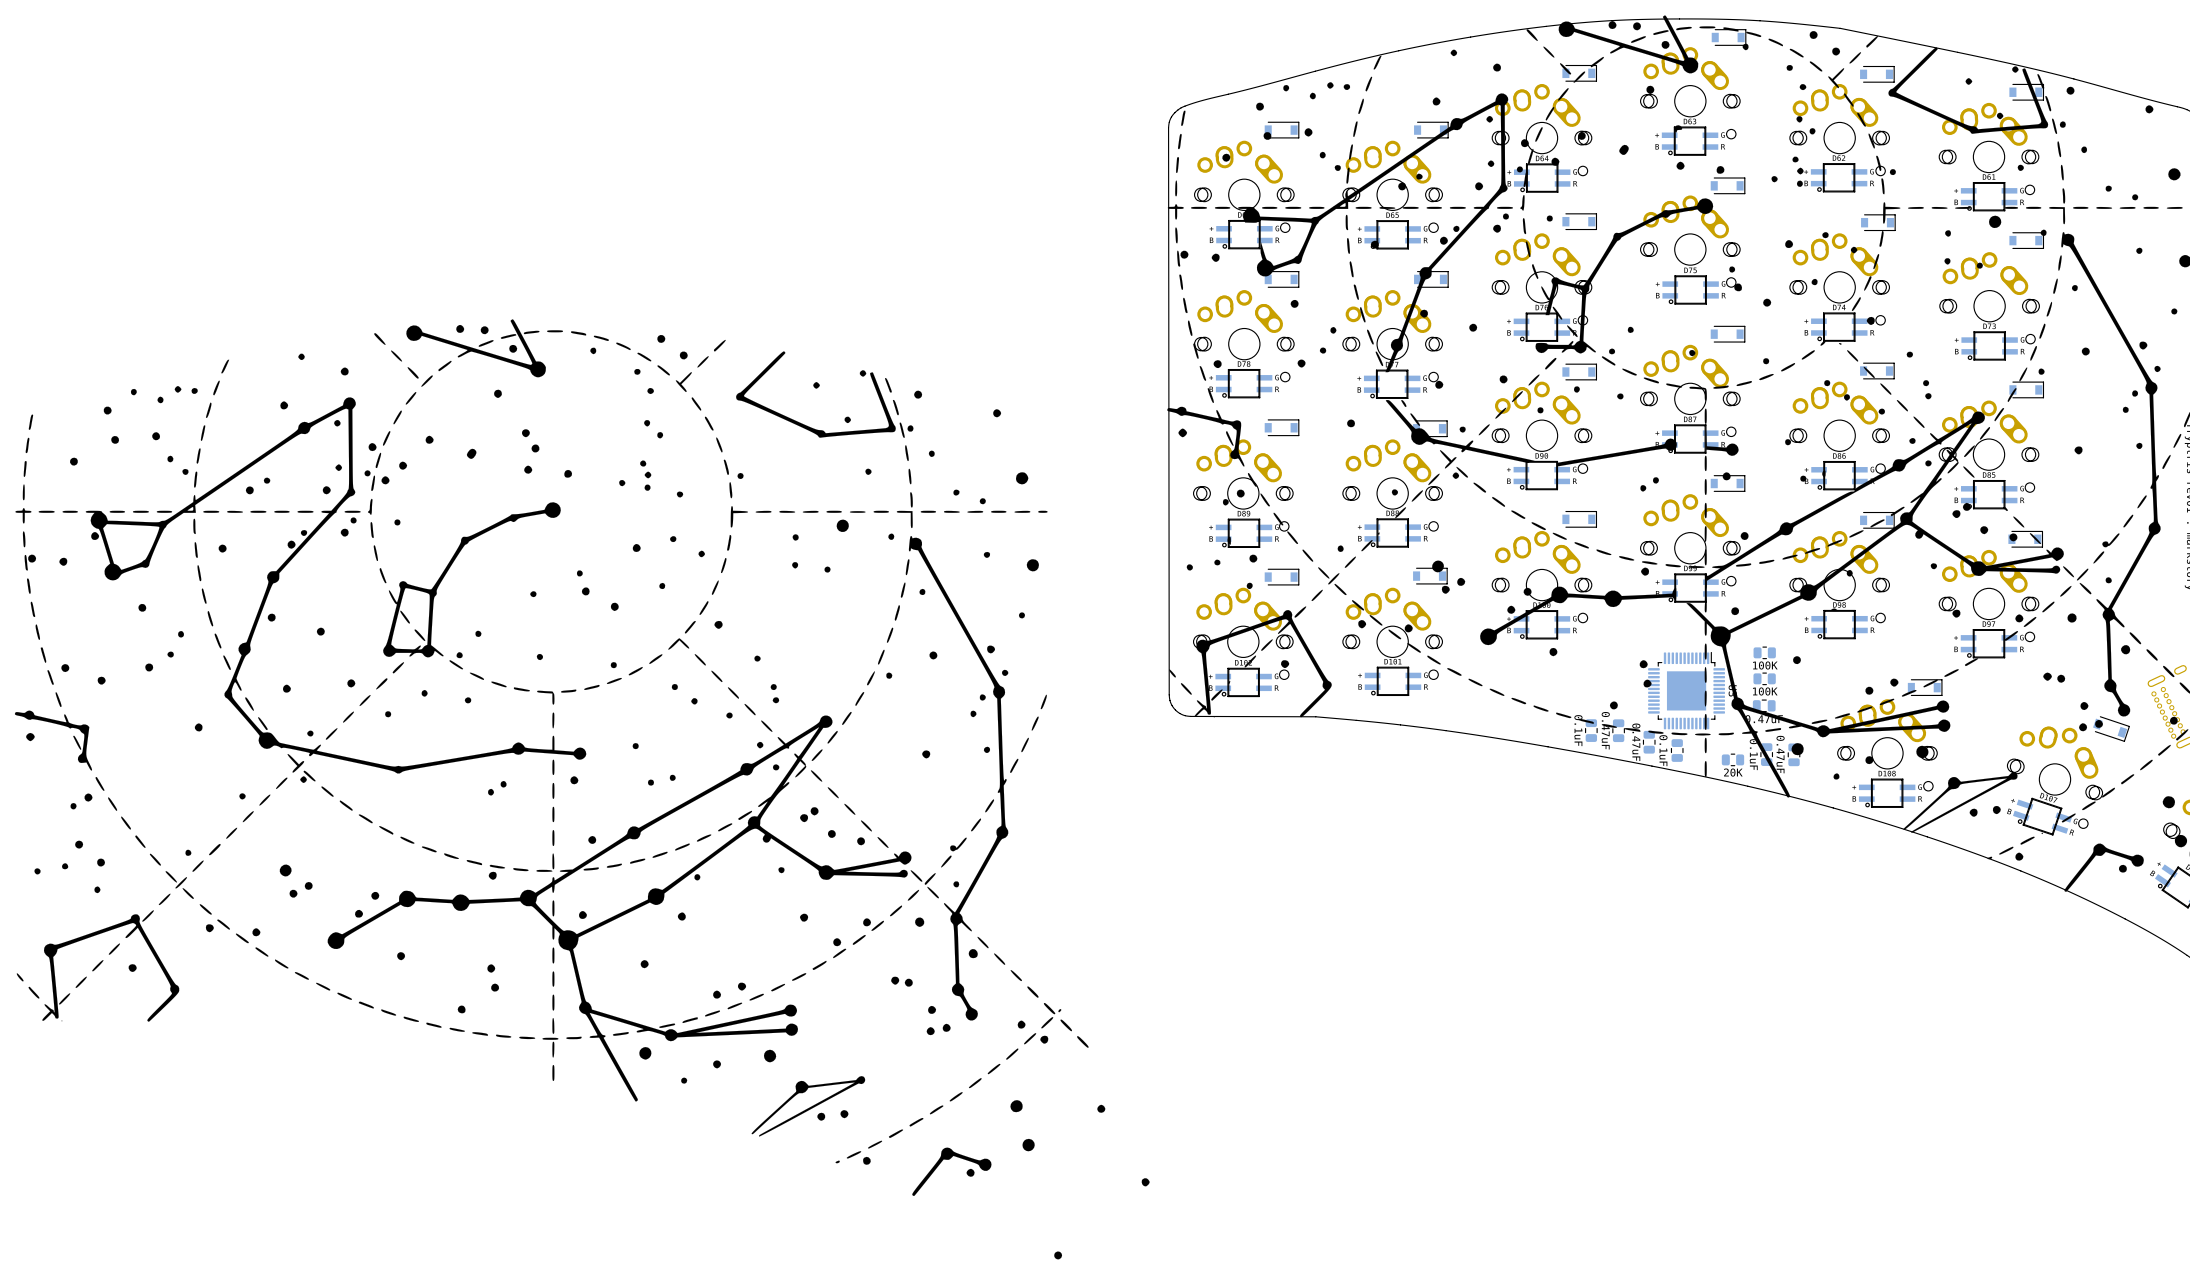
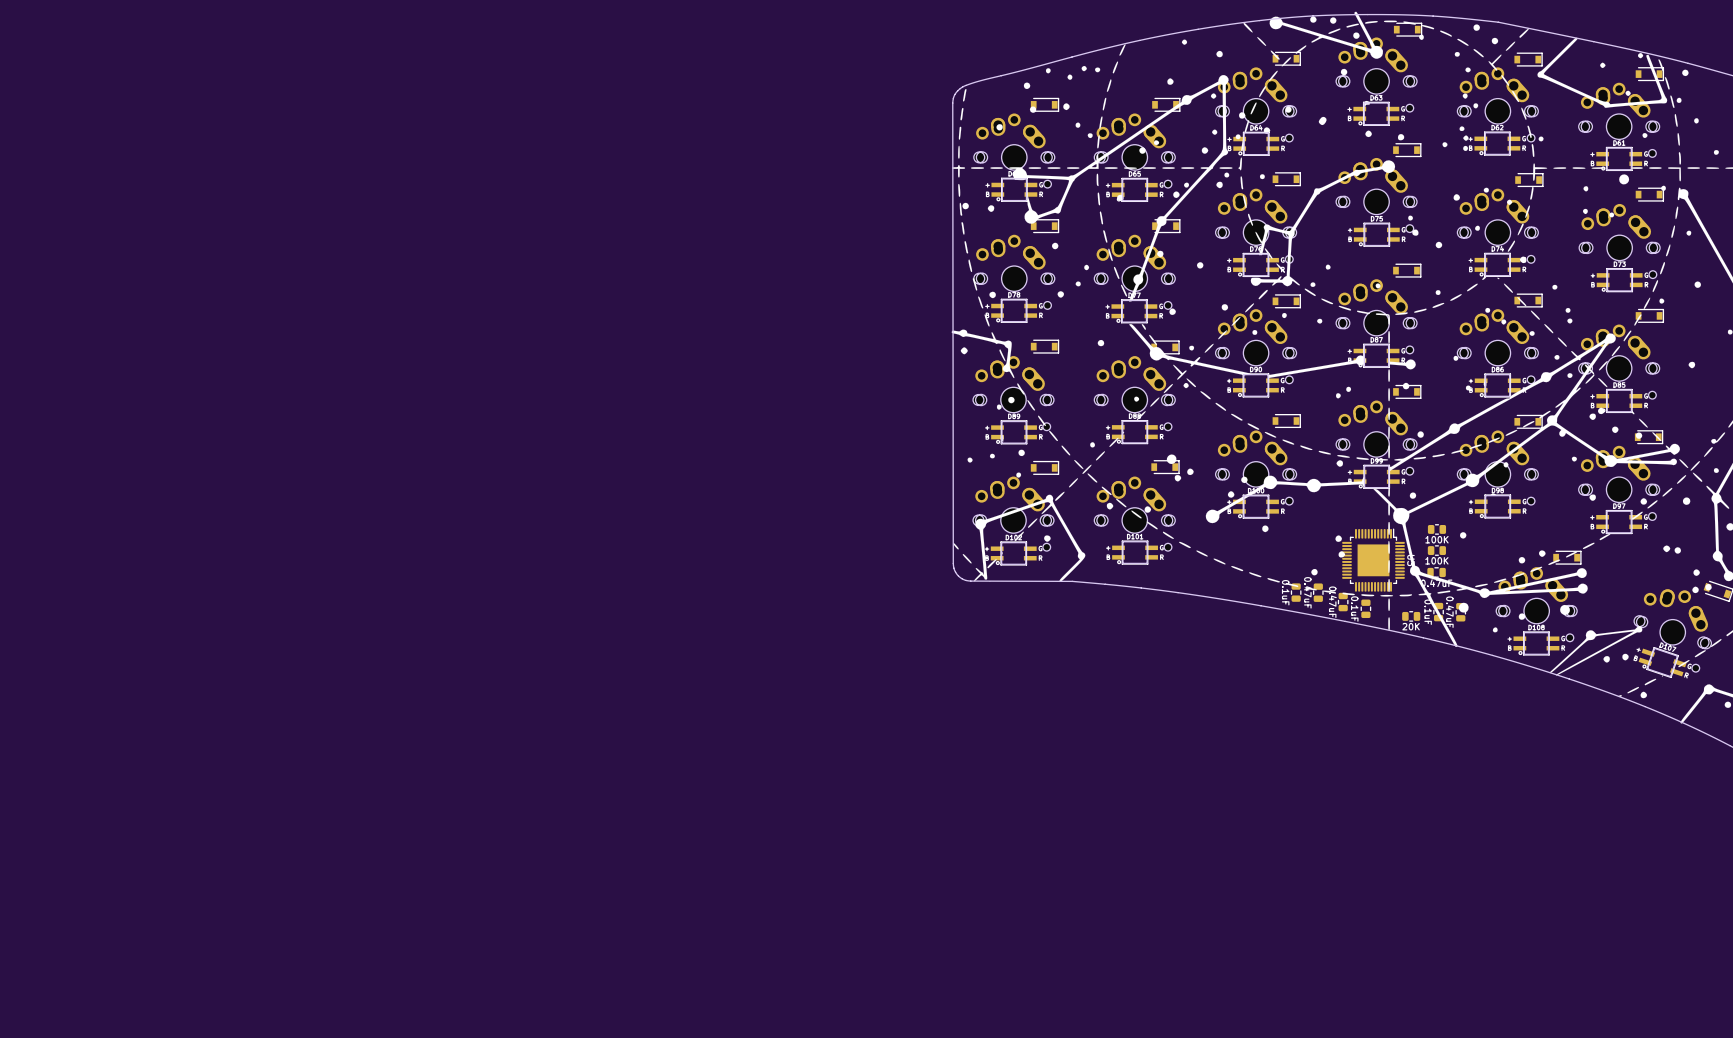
drawing: [14, 319, 1150, 1260] -> none

